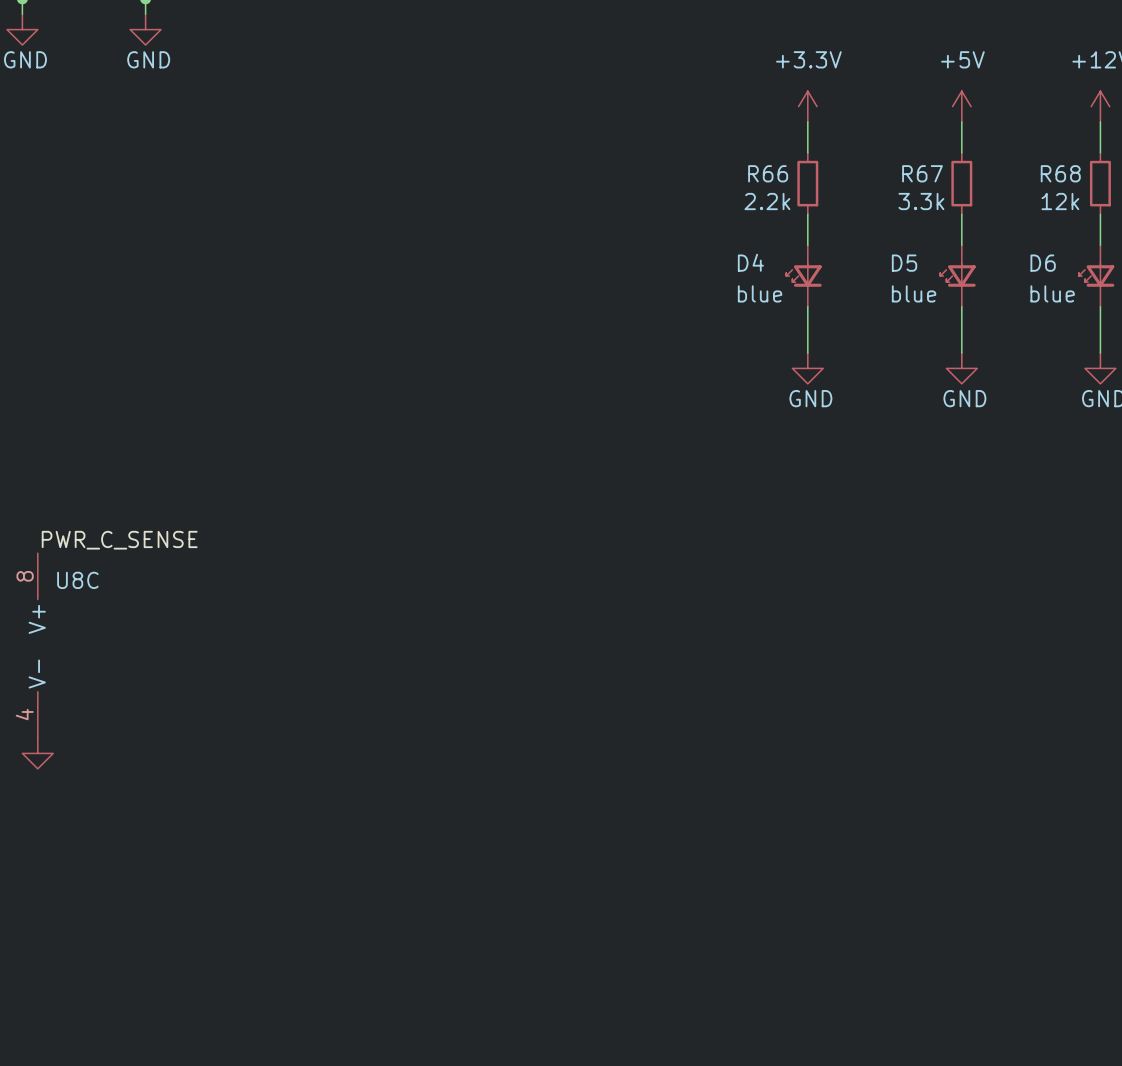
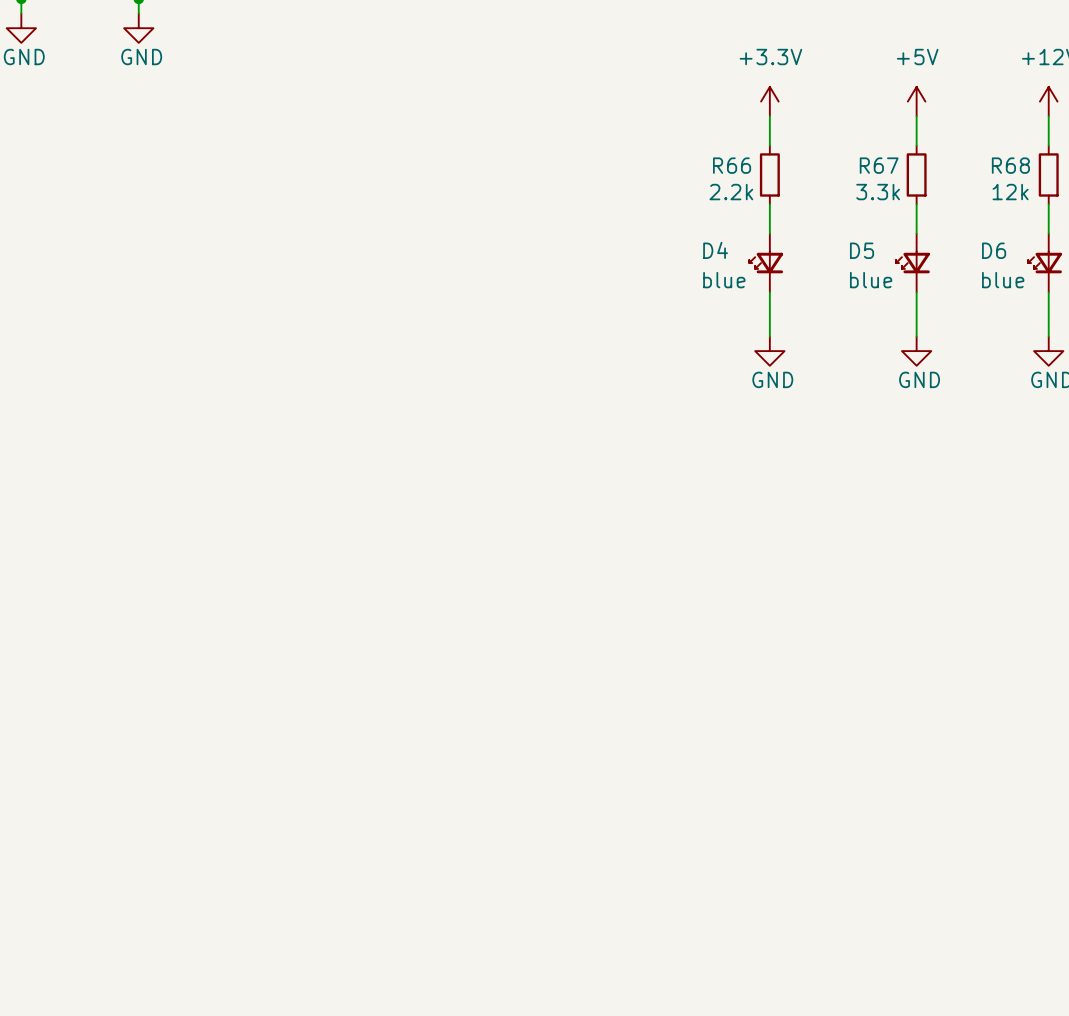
label: PWR_C_SENSE (119, 540) -> none
U8C: (37, 645) -> none
power symbol: (37, 753) -> none

